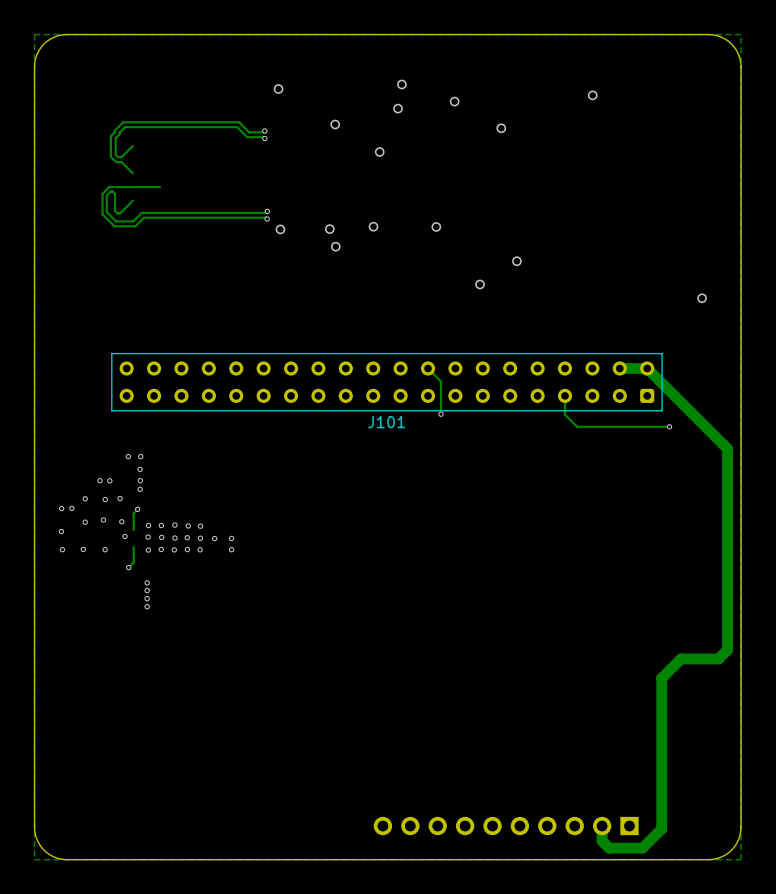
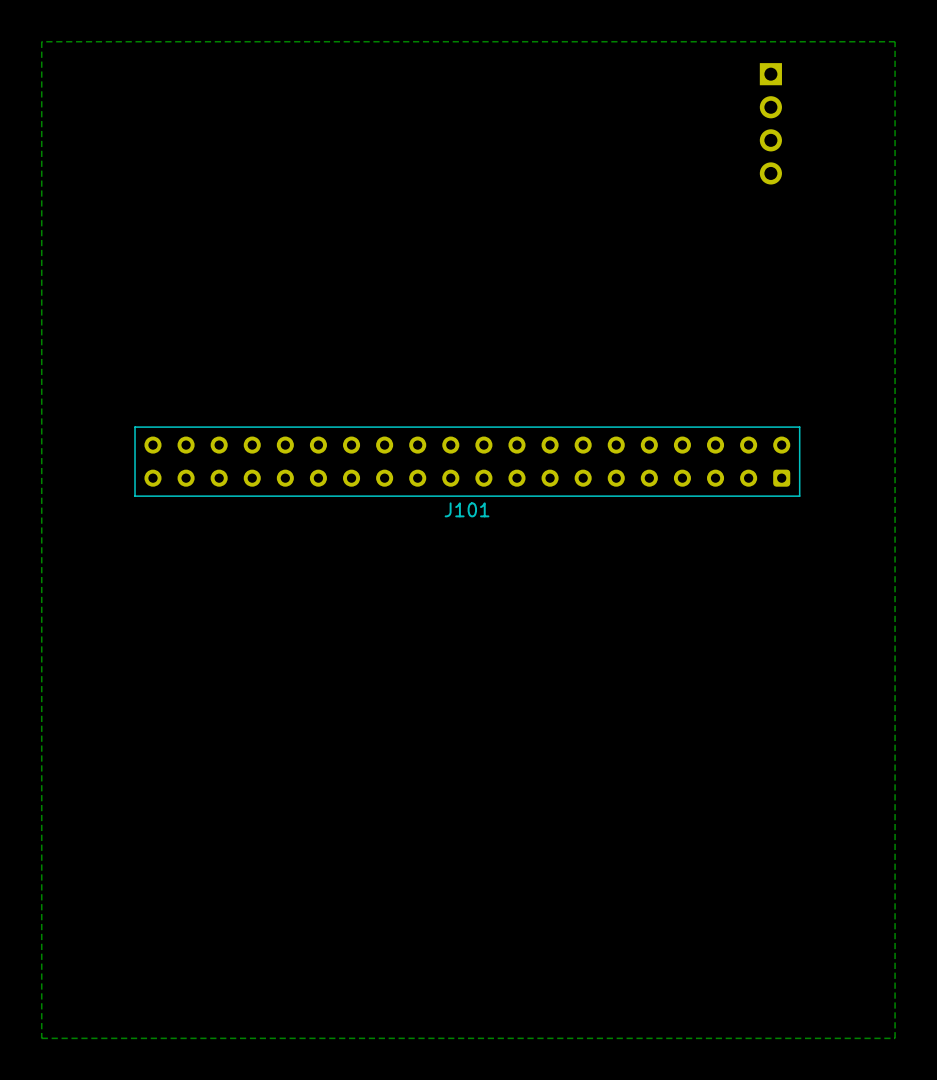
board edge: (708, 34) (66, 34) (50, 38) (41, 47) (37, 54) (34, 66) (34, 827) (37, 839) (47, 852) (54, 857) (66, 859) (708, 859) (721, 857) (734, 847) (738, 839) (741, 827) (741, 66) (738, 54) (731, 44) (721, 37) (708, 34) -> none
via: (401, 84) -> none
via: (278, 89) -> none
via: (592, 95) -> none
via: (454, 101) -> none
part: none -> (770, 123)
via: (398, 108) -> none
via: (335, 124) -> none
via: (501, 128) -> none
track: (264, 130) (249, 132) (239, 122) (123, 122) (110, 136) (110, 156) (116, 162) (121, 162) (132, 173) -> none
via: (264, 130) -> none
track: (264, 138) (247, 137) (237, 127) (125, 127) (115, 138) (115, 154) (121, 157) (132, 145) -> none
via: (264, 138) -> none
via: (379, 152) -> none
track: (160, 187) (109, 187) (102, 193) (102, 214) (114, 226) (135, 226) (143, 217) (267, 218) -> none
track: (132, 200) (120, 213) (117, 213) (115, 210) (115, 193) (111, 191) (106, 195) (106, 212) (116, 221) (133, 221) (141, 212) (267, 211) -> none
via: (267, 211) -> none
via: (267, 218) -> none
via: (373, 226) -> none
via: (436, 226) -> none
via: (280, 229) -> none
via: (329, 229) -> none
via: (335, 246) -> none
via: (516, 261) -> none
via: (480, 284) -> none
via: (702, 298) -> none
track: (428, 368) (440, 381) (440, 414) -> none
track: (619, 368) (647, 368) (727, 449) (727, 649) (718, 658) (681, 658) (661, 678) (661, 828) (642, 848) -> none
track: (565, 395) (565, 414) (577, 426) (669, 426) -> none
via: (440, 414) -> none
via: (669, 426) -> none
via: (128, 456) -> none
via: (140, 456) -> none
via: (140, 469) -> none
via: (100, 480) -> none
via: (109, 480) -> none
via: (140, 480) -> none
via: (140, 489) -> none
via: (85, 498) -> none
via: (120, 498) -> none
via: (105, 499) -> none
via: (61, 508) -> none
via: (71, 508) -> none
track: (137, 509) (133, 513) (133, 530) -> none
via: (137, 509) -> none
via: (103, 520) -> none
via: (121, 521) -> none
via: (85, 522) -> none
via: (148, 525) -> none
via: (161, 525) -> none
via: (174, 525) -> none
via: (188, 525) -> none
via: (200, 526) -> none
via: (61, 531) -> none
via: (124, 536) -> none
via: (148, 537) -> none
via: (161, 537) -> none
via: (187, 537) -> none
via: (174, 538) -> none
via: (200, 538) -> none
via: (214, 538) -> none
via: (231, 538) -> none
track: (133, 547) (133, 562) (128, 567) -> none
via: (62, 549) -> none
via: (83, 549) -> none
via: (105, 549) -> none
via: (161, 549) -> none
via: (174, 549) -> none
via: (187, 549) -> none
via: (200, 549) -> none
via: (231, 549) -> none
via: (148, 550) -> none
via: (128, 567) -> none
via: (147, 582) -> none
via: (147, 590) -> none
via: (147, 598) -> none
via: (147, 606) -> none
part: (506, 826) -> none
track: (602, 826) (601, 840) (609, 848) (642, 848) -> none

